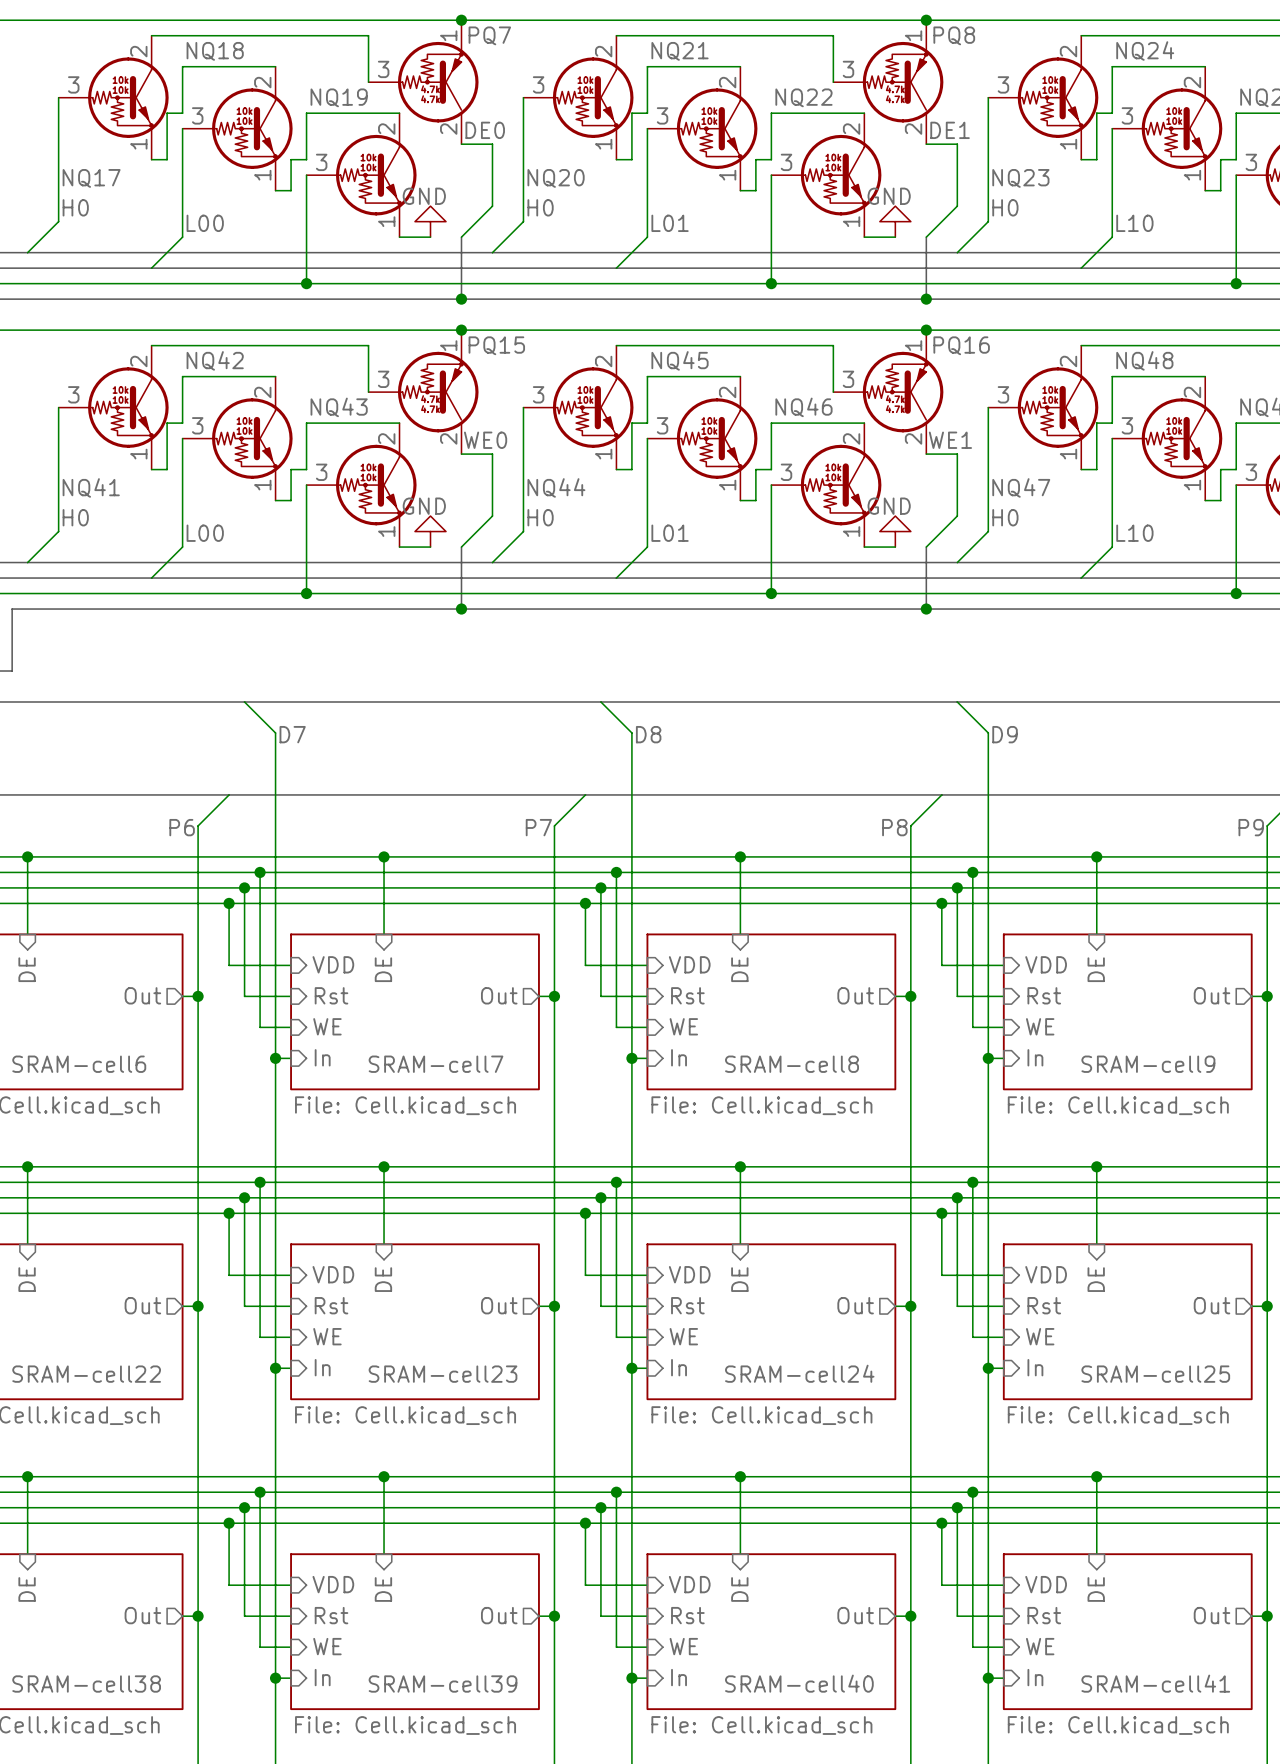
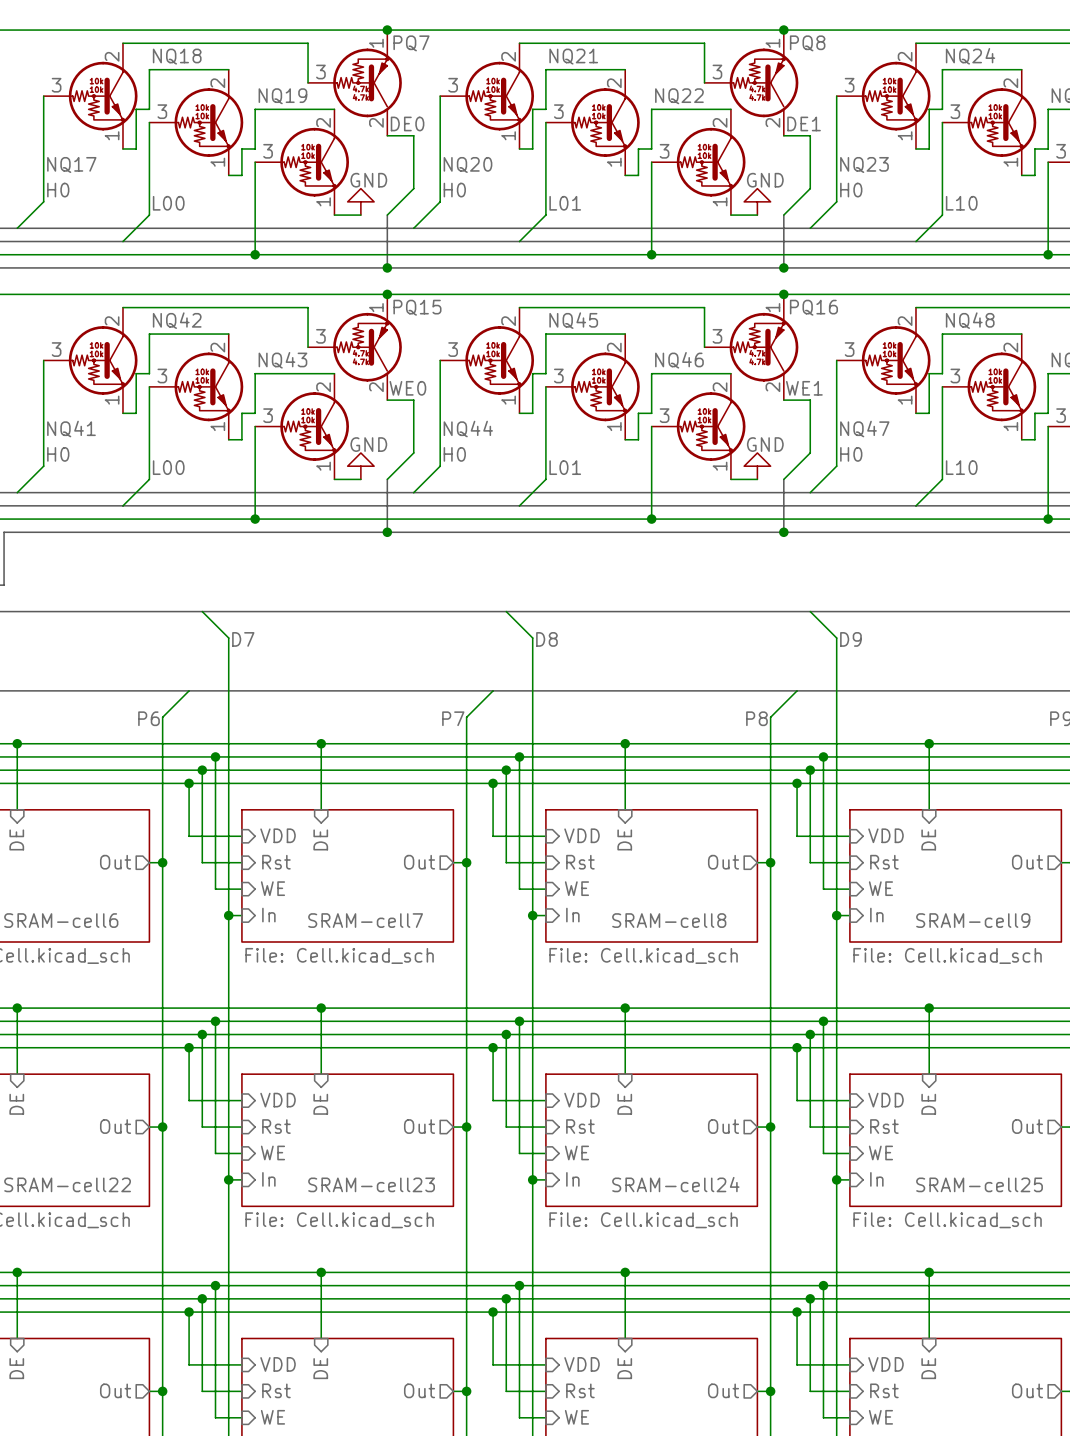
power symbol text position: GND (424, 196) -> GND (368, 180)
power symbol text position: GND (889, 196) -> GND (765, 180)
power symbol text position: GND (424, 506) -> GND (368, 444)
power symbol text position: GND (889, 506) -> GND (765, 444)

